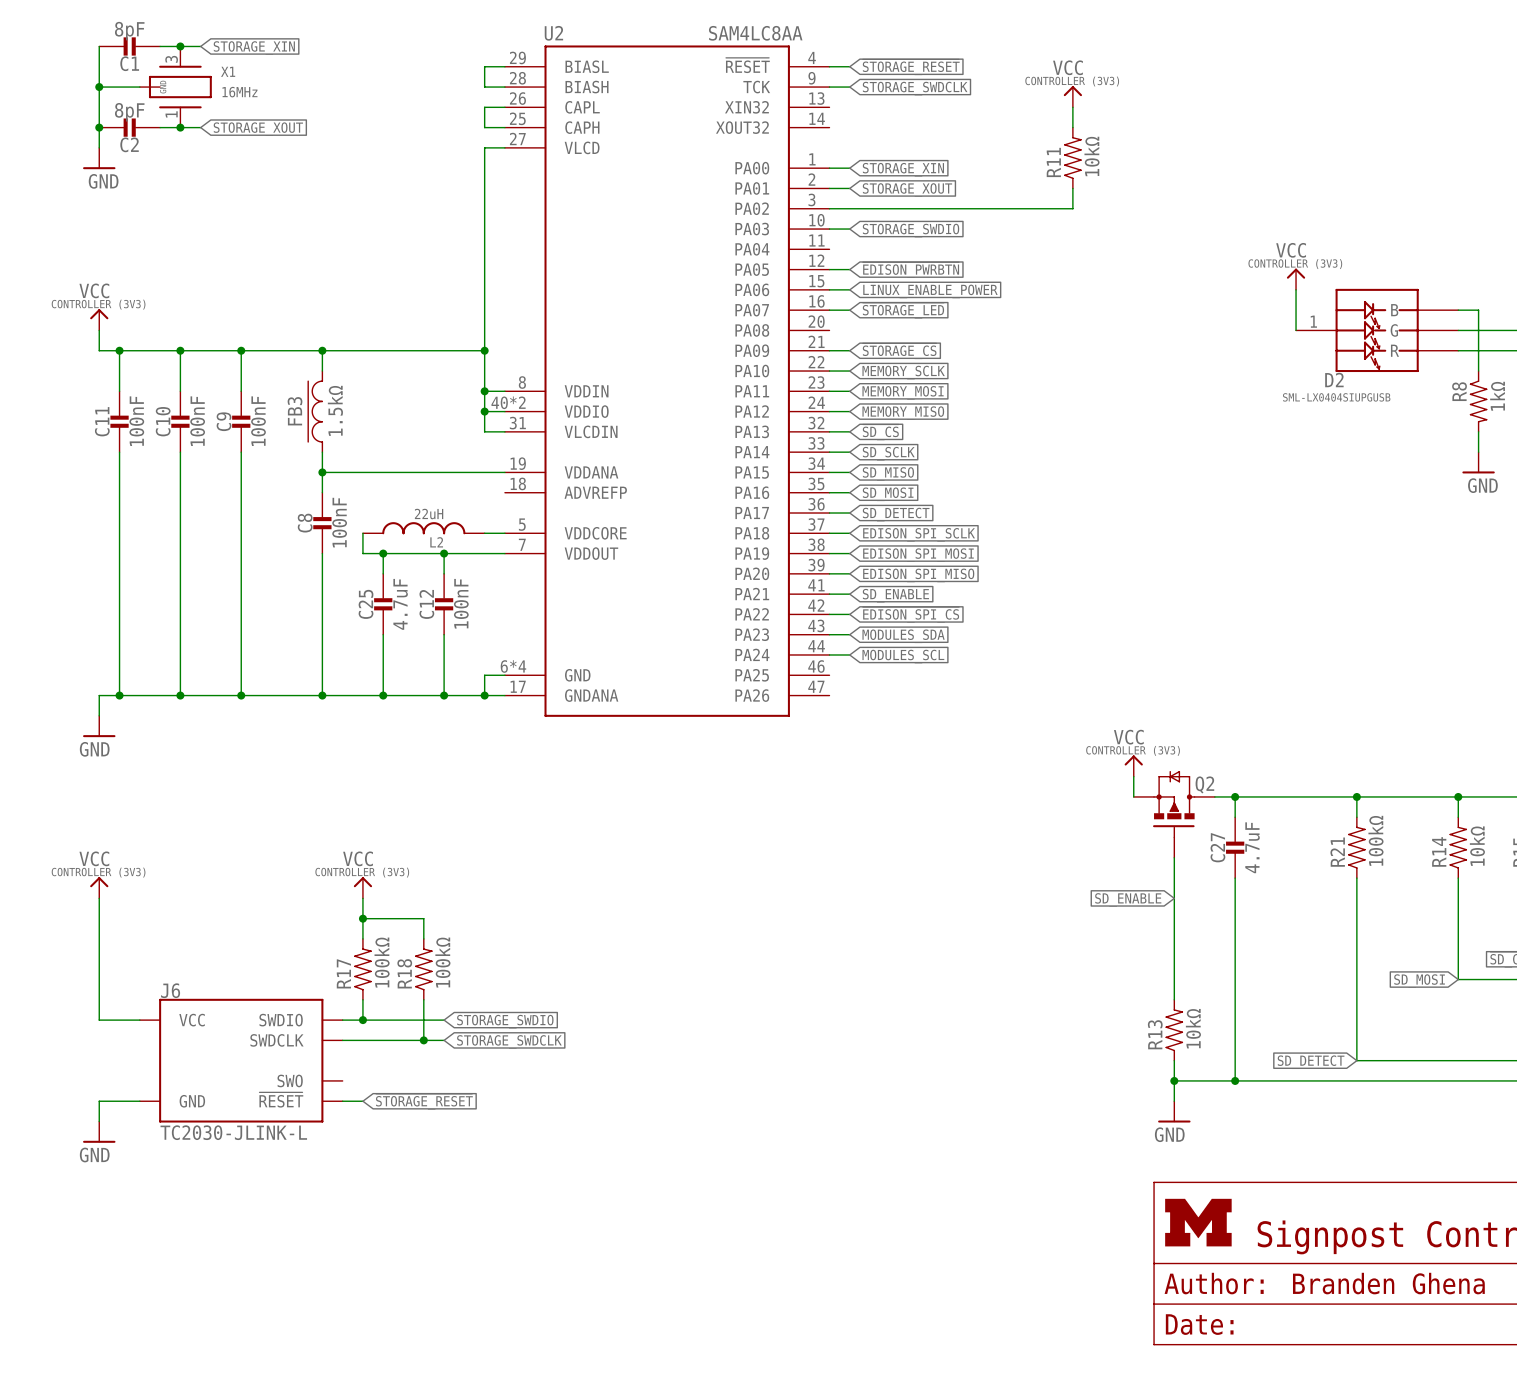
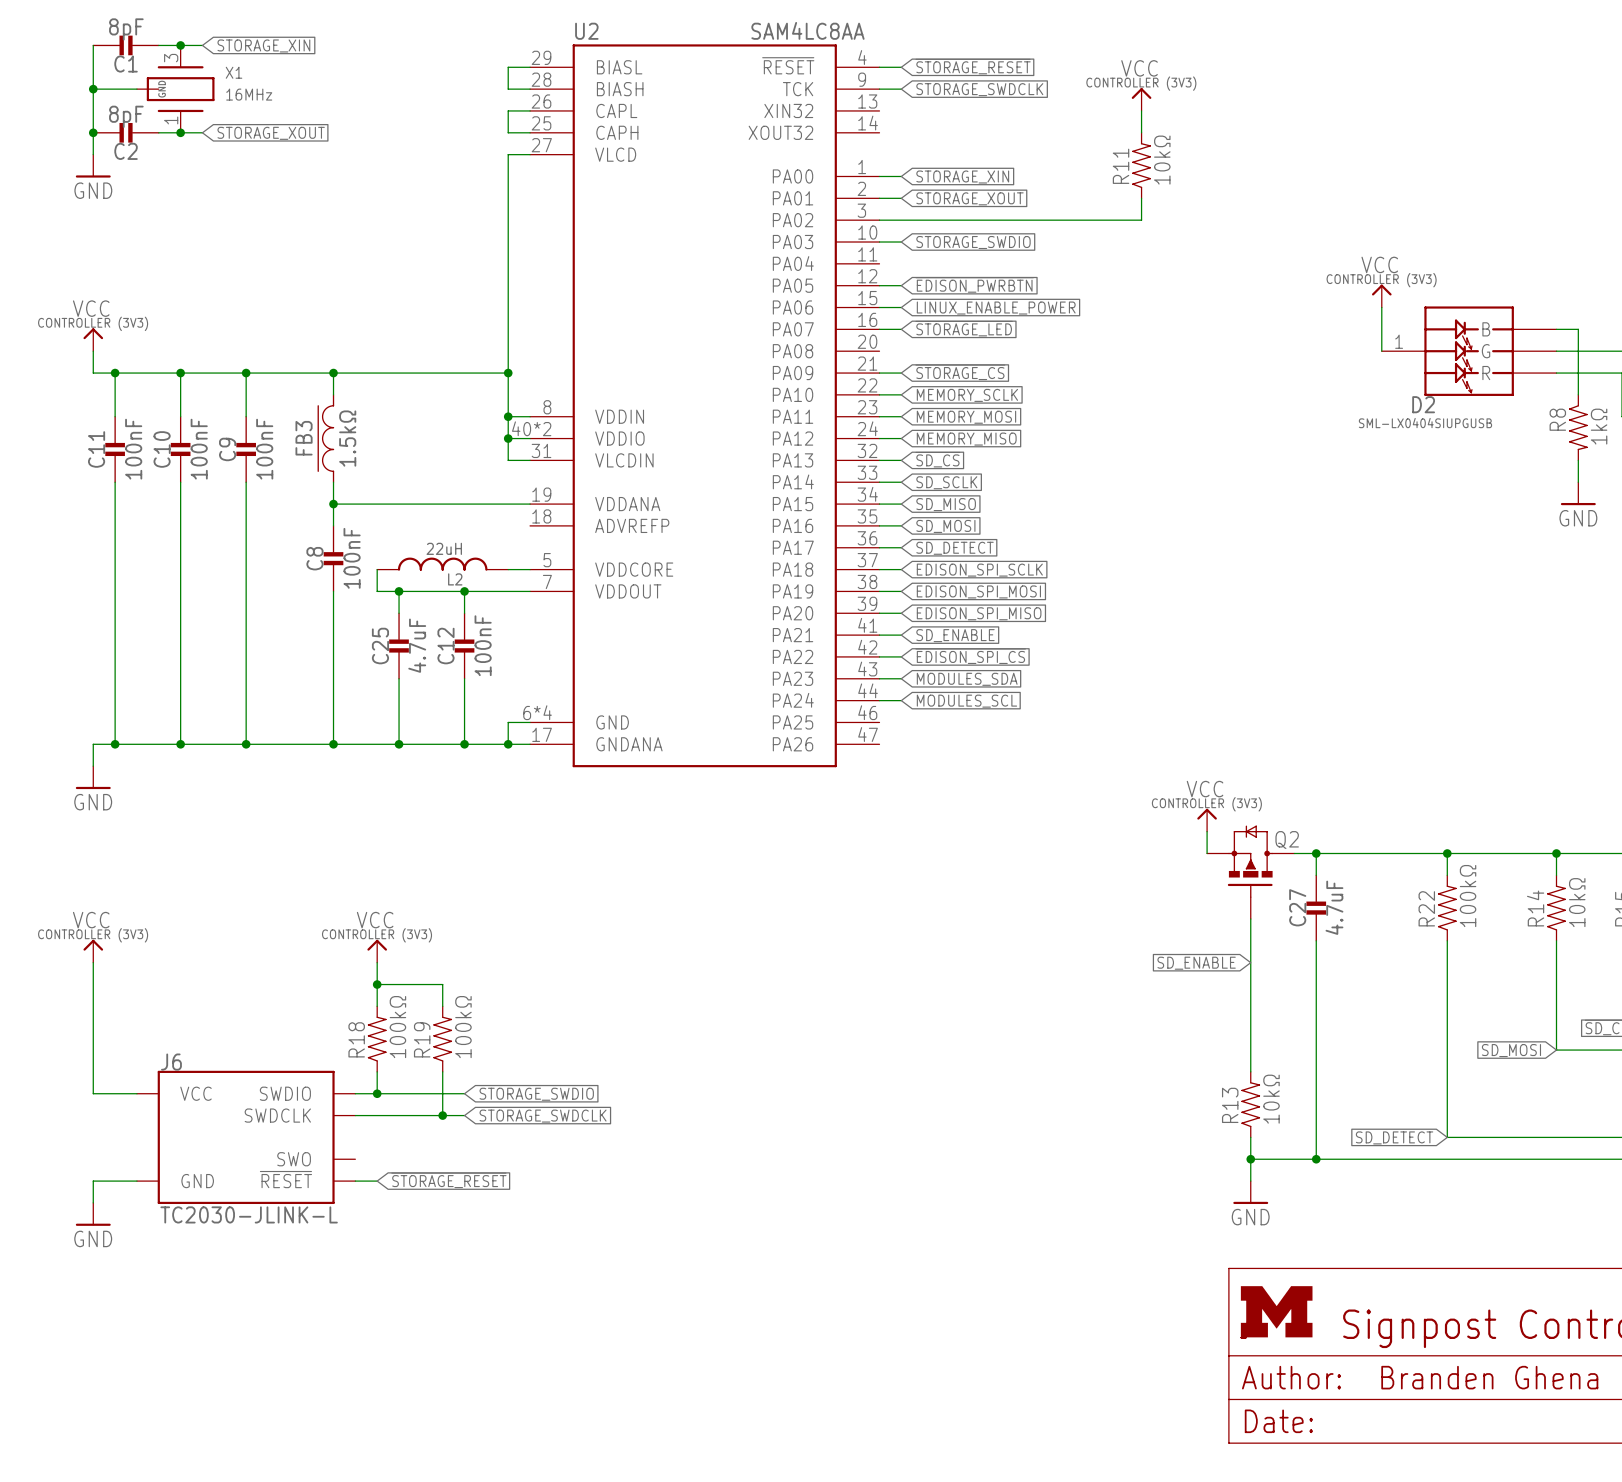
R21 name: R21 (1337, 852) -> R22 (1426, 908)
R17 name: R17 (343, 973) -> R18 (356, 1039)
R18 name: R18 (404, 973) -> R19 (422, 1039)

